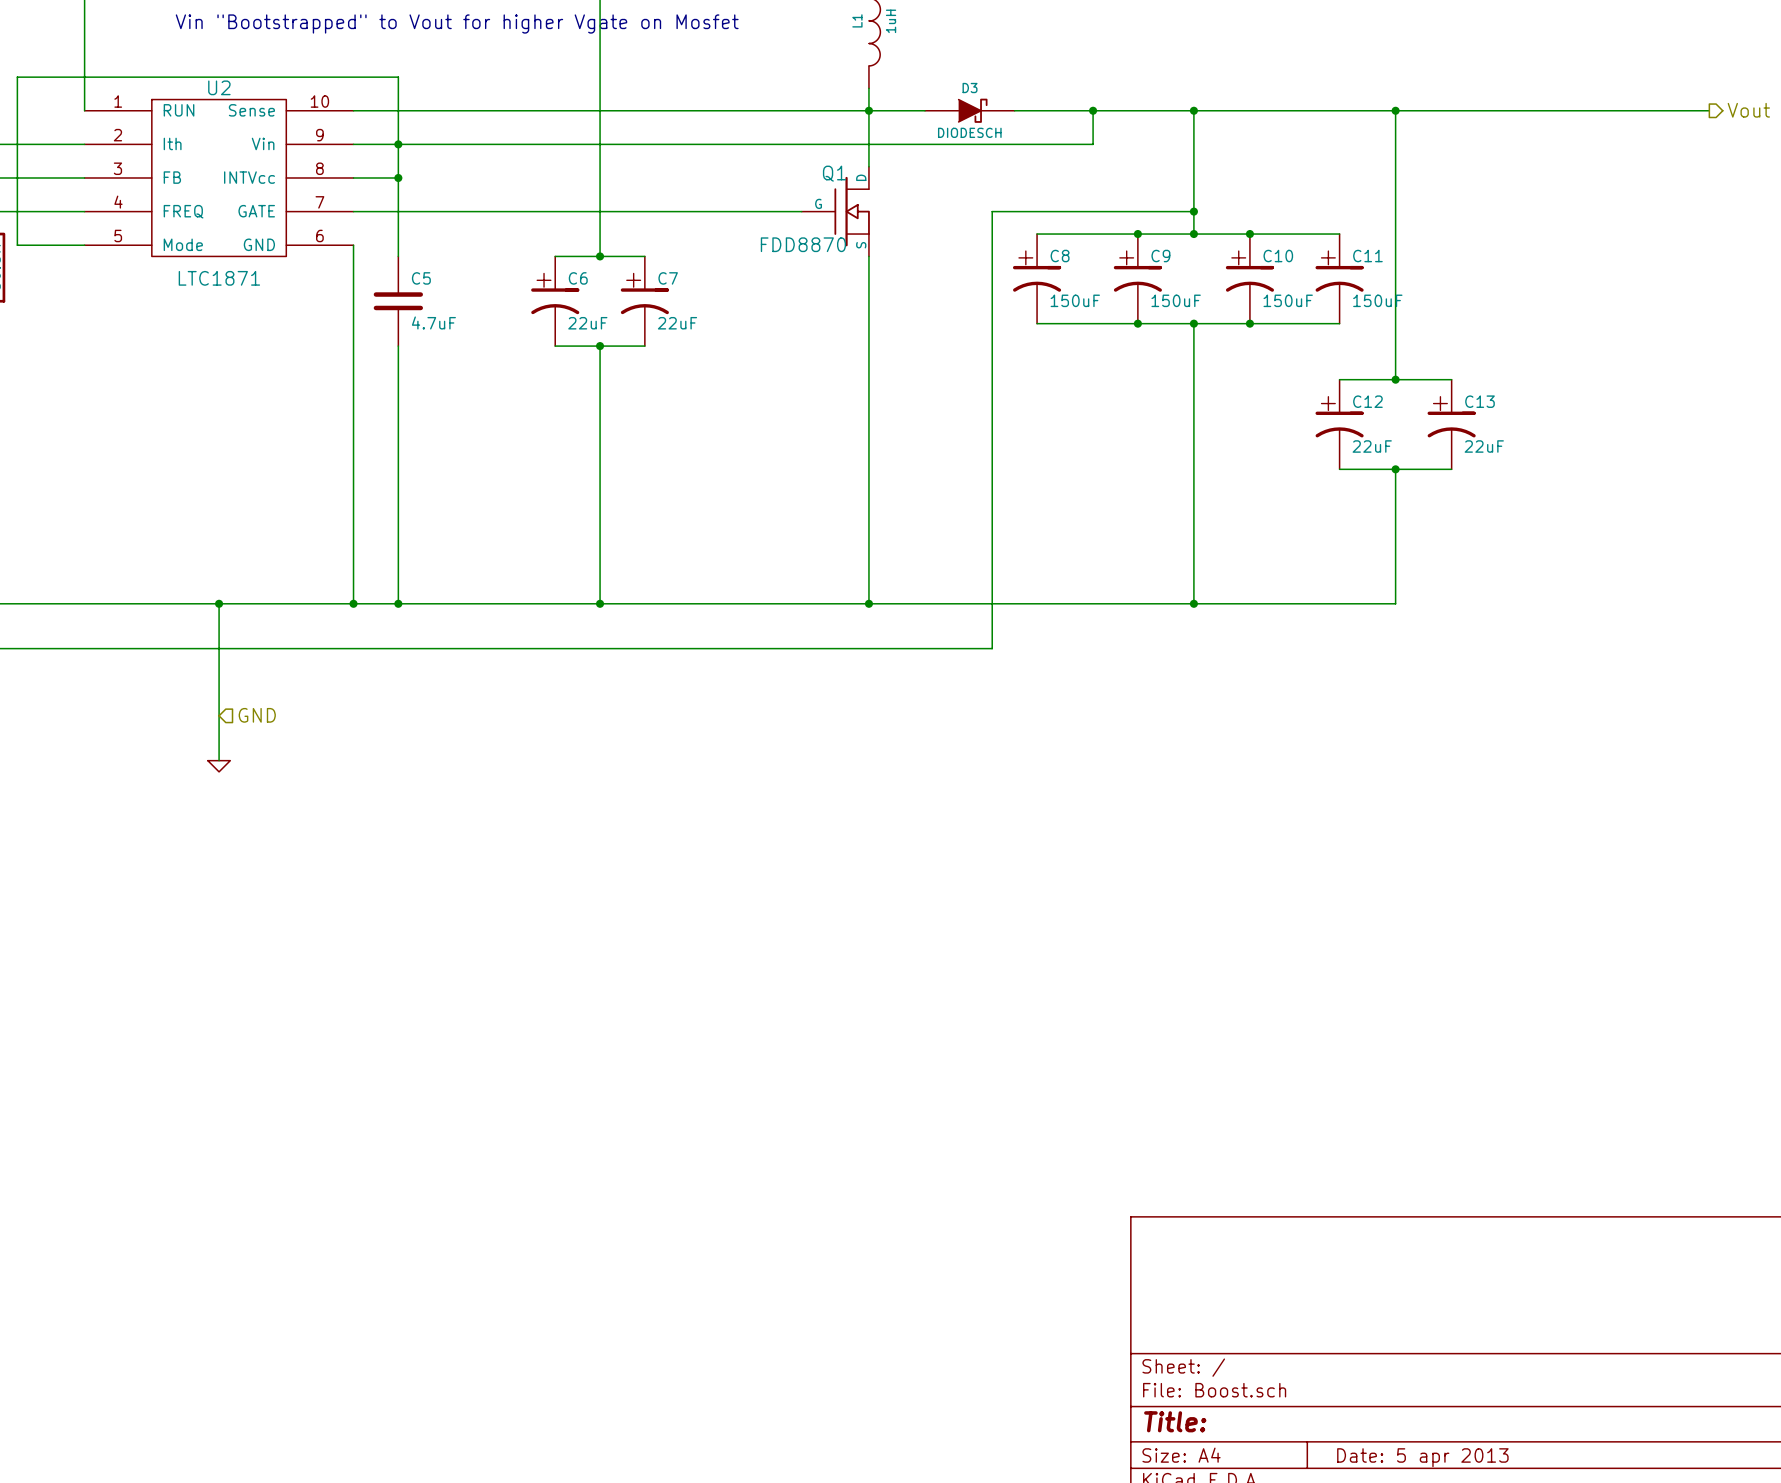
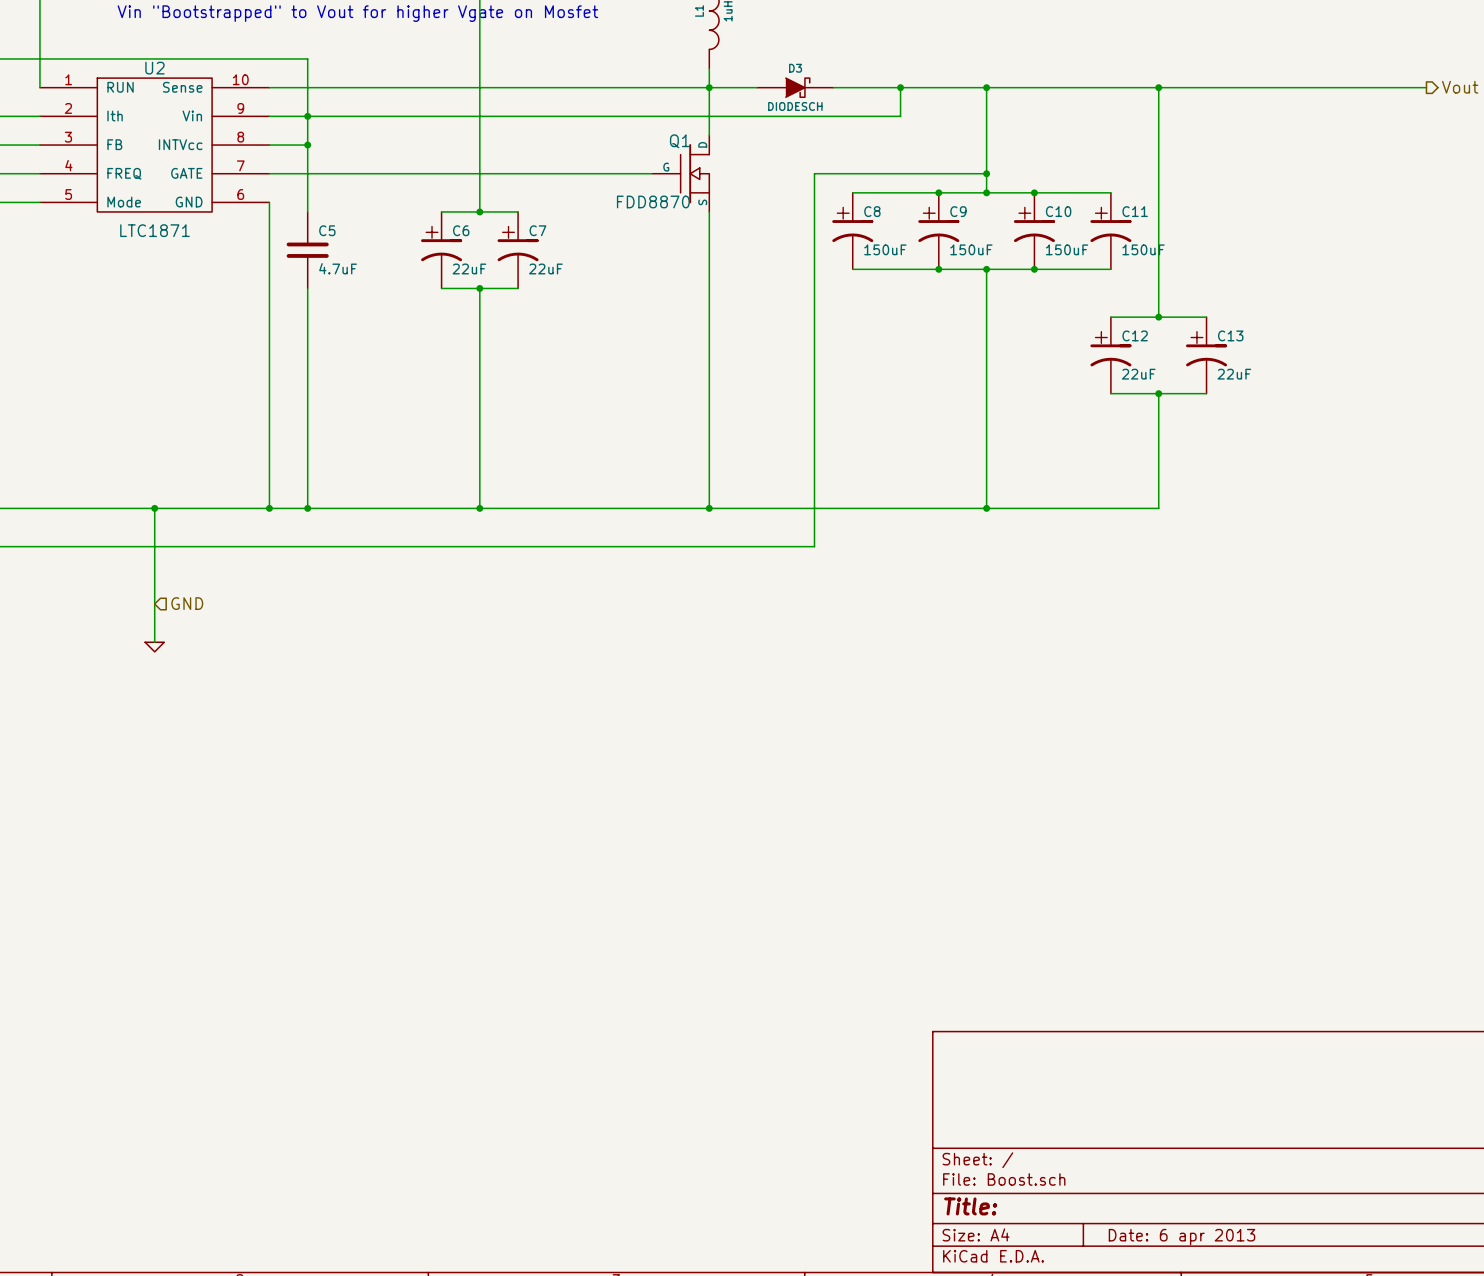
title block: Date: 5 apr 2013 (1422, 1457) -> Date: 6 apr 2013 (1182, 1237)

